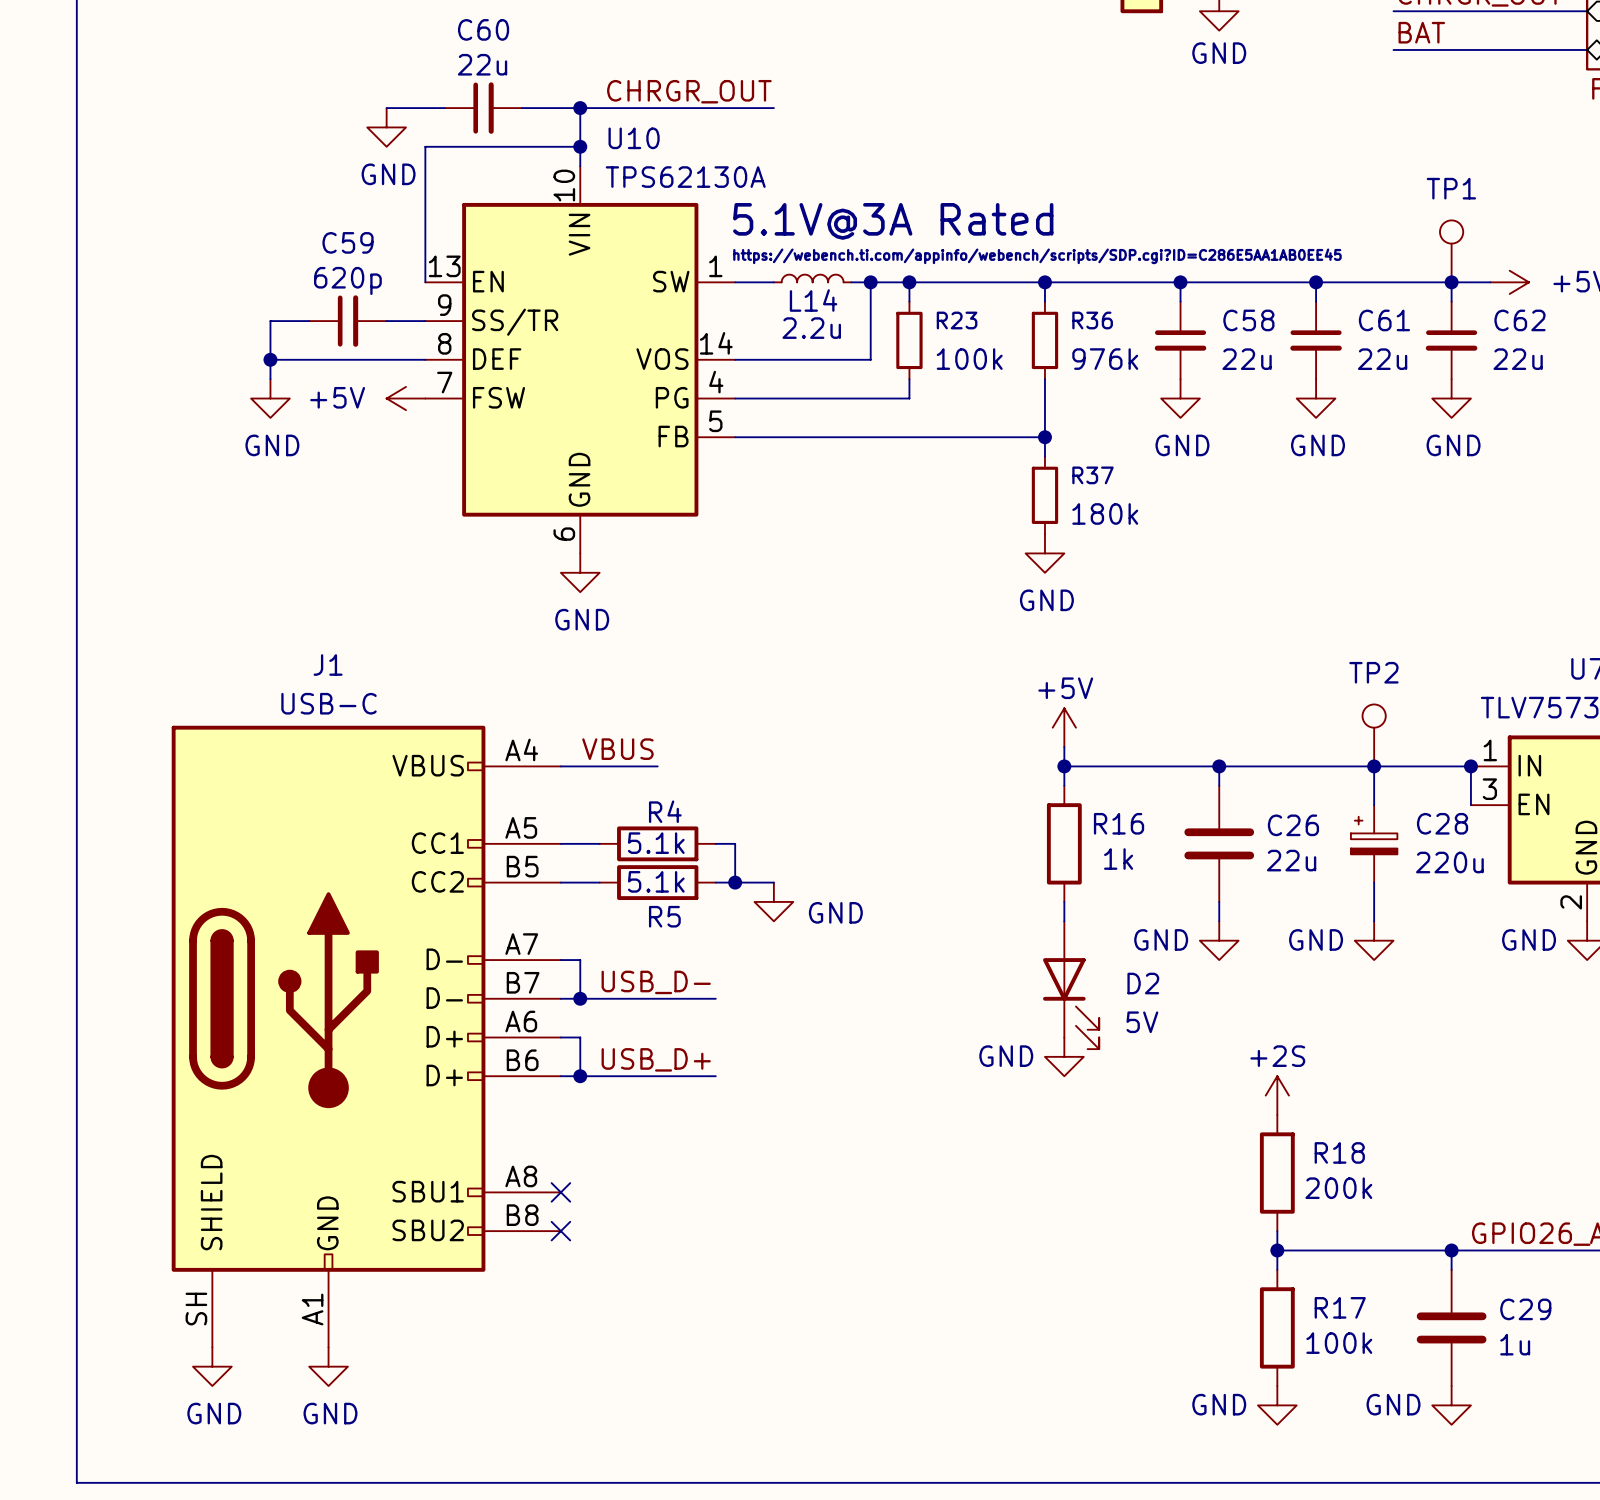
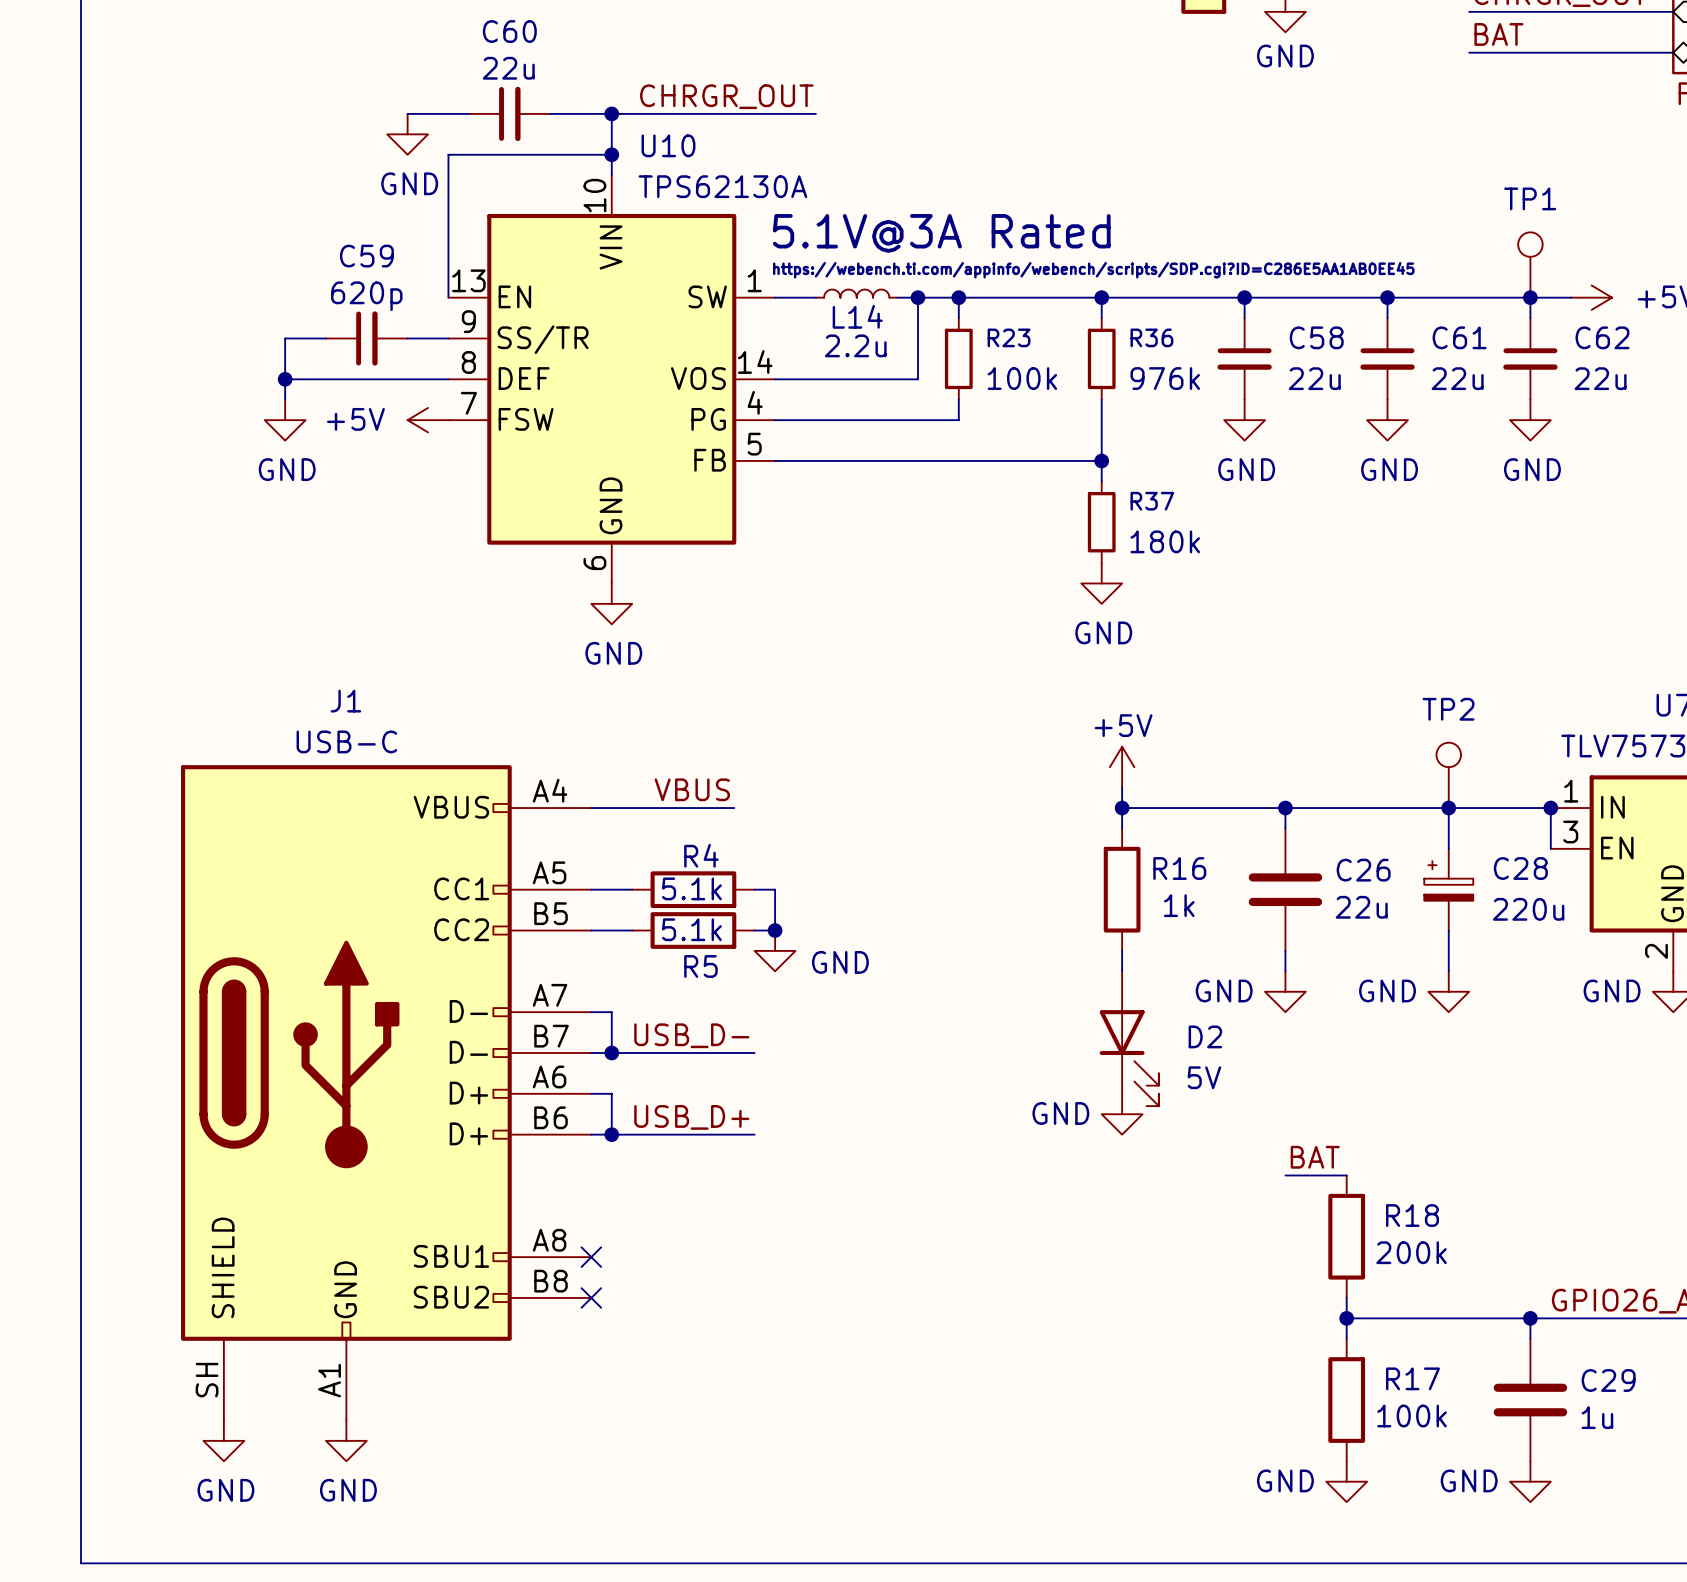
label position: VBUS (617, 749) -> VBUS (692, 789)
wire: (735, 882) (773, 882) -> (693, 808) (734, 808)
power symbol position: GND (773, 901) -> GND (775, 950)
power symbol: +2S (1277, 1095) -> none
label: none -> BAT (1315, 1157)
wire: none -> (1285, 1175) (1346, 1175)

